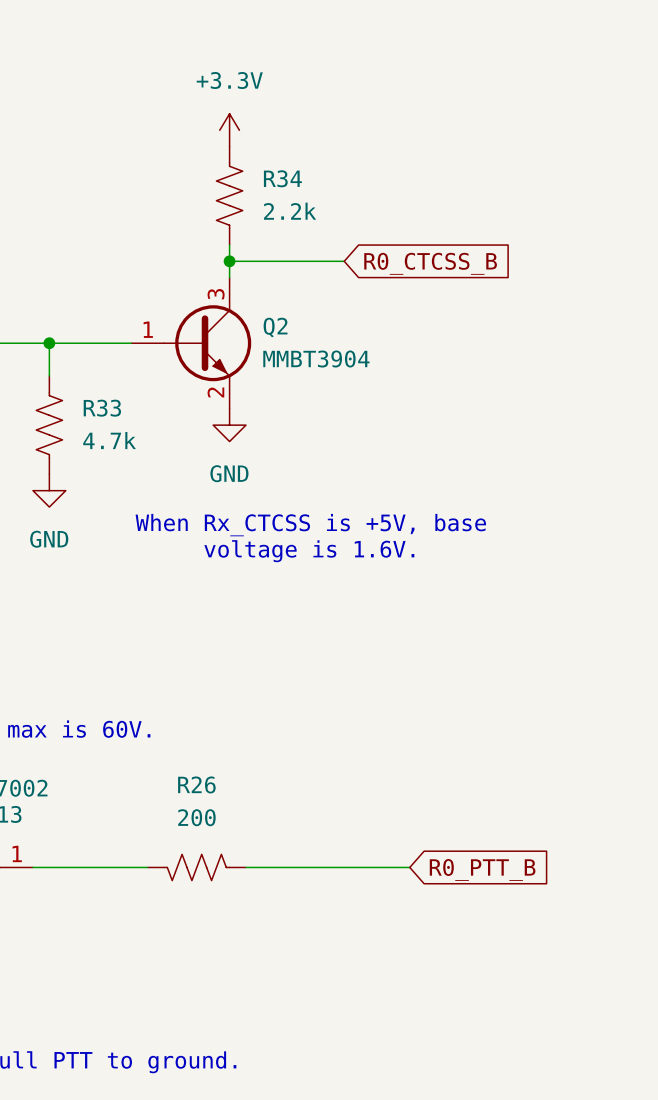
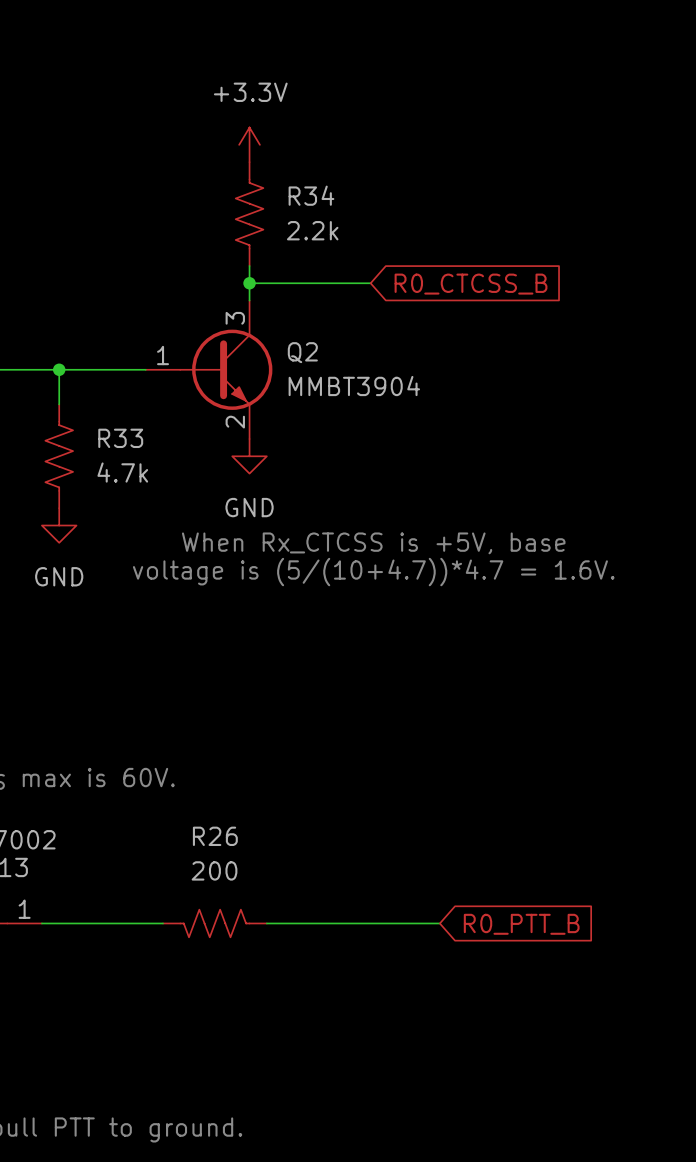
text position: When Rx_CTCSS is +5V, base (310, 525) -> When Rx_CTCSS is +5V, base (373, 543)
text: voltage is 1.6V. (309, 551) -> voltage is (5/(10+4.7))*4.7 = 1.6V. (373, 572)

